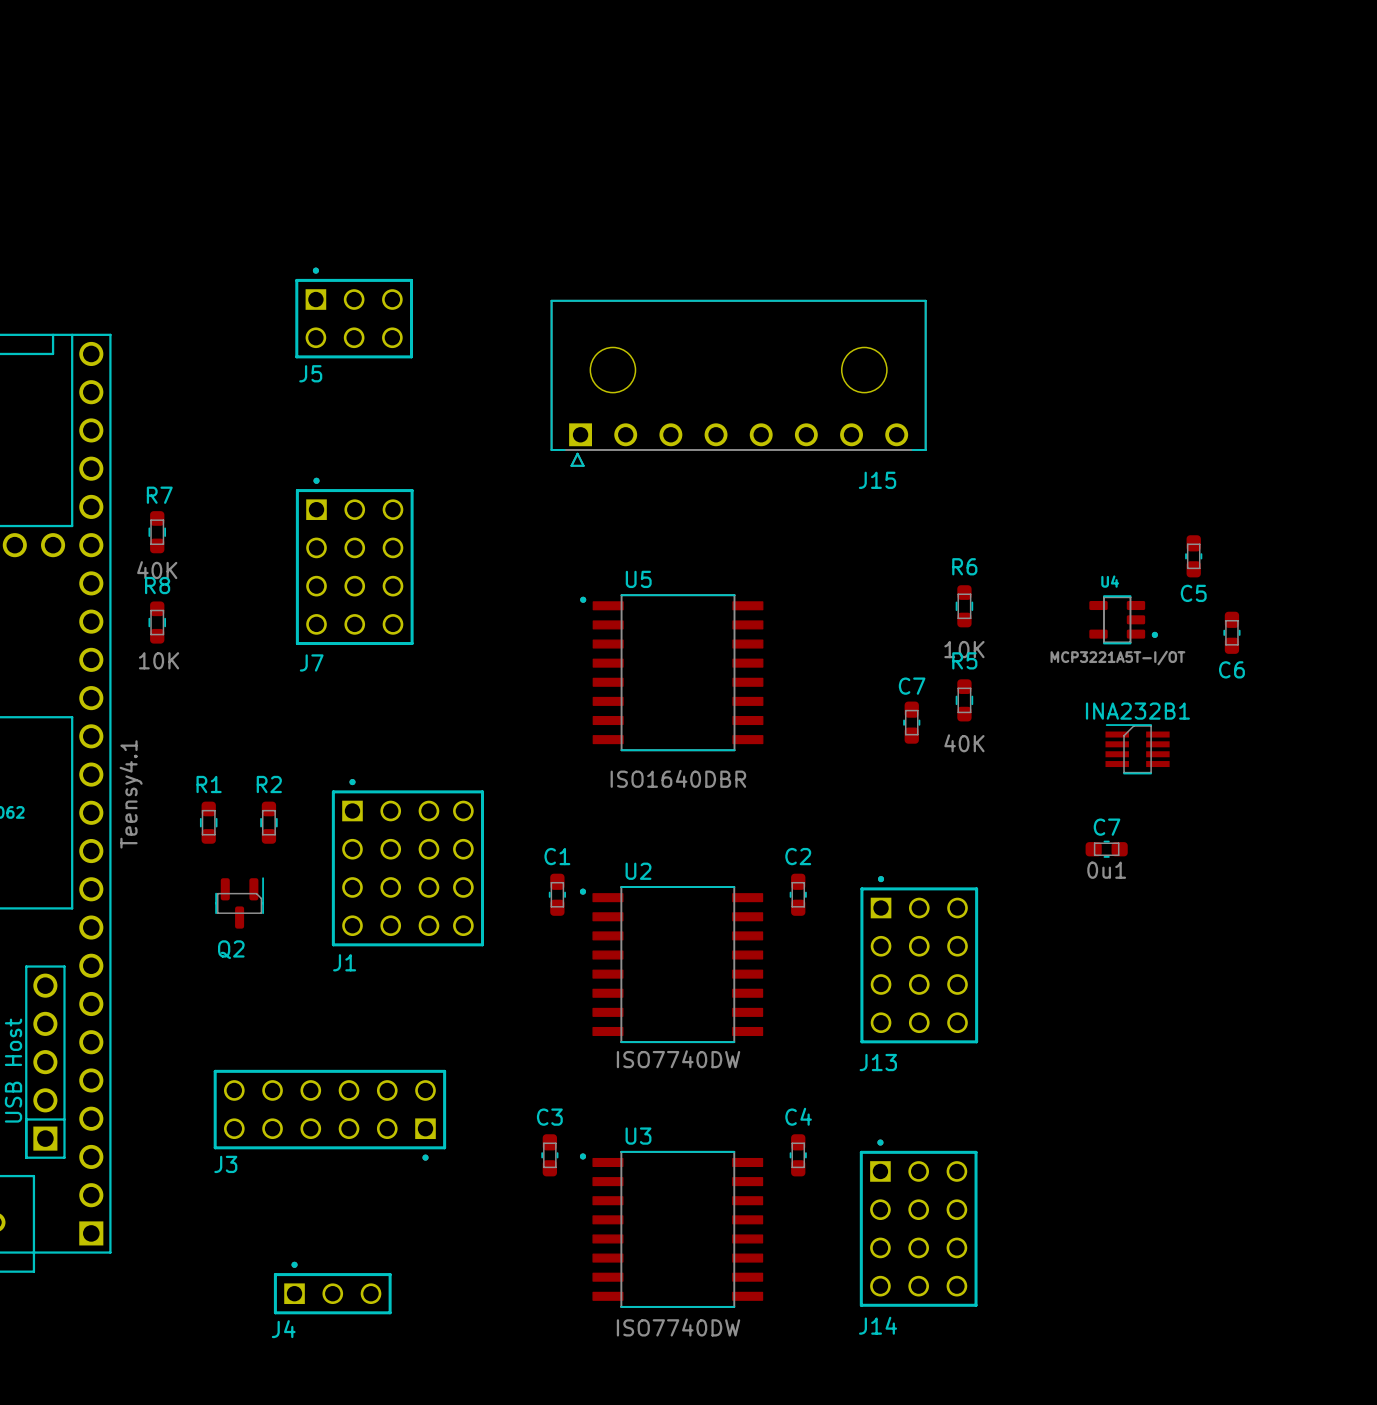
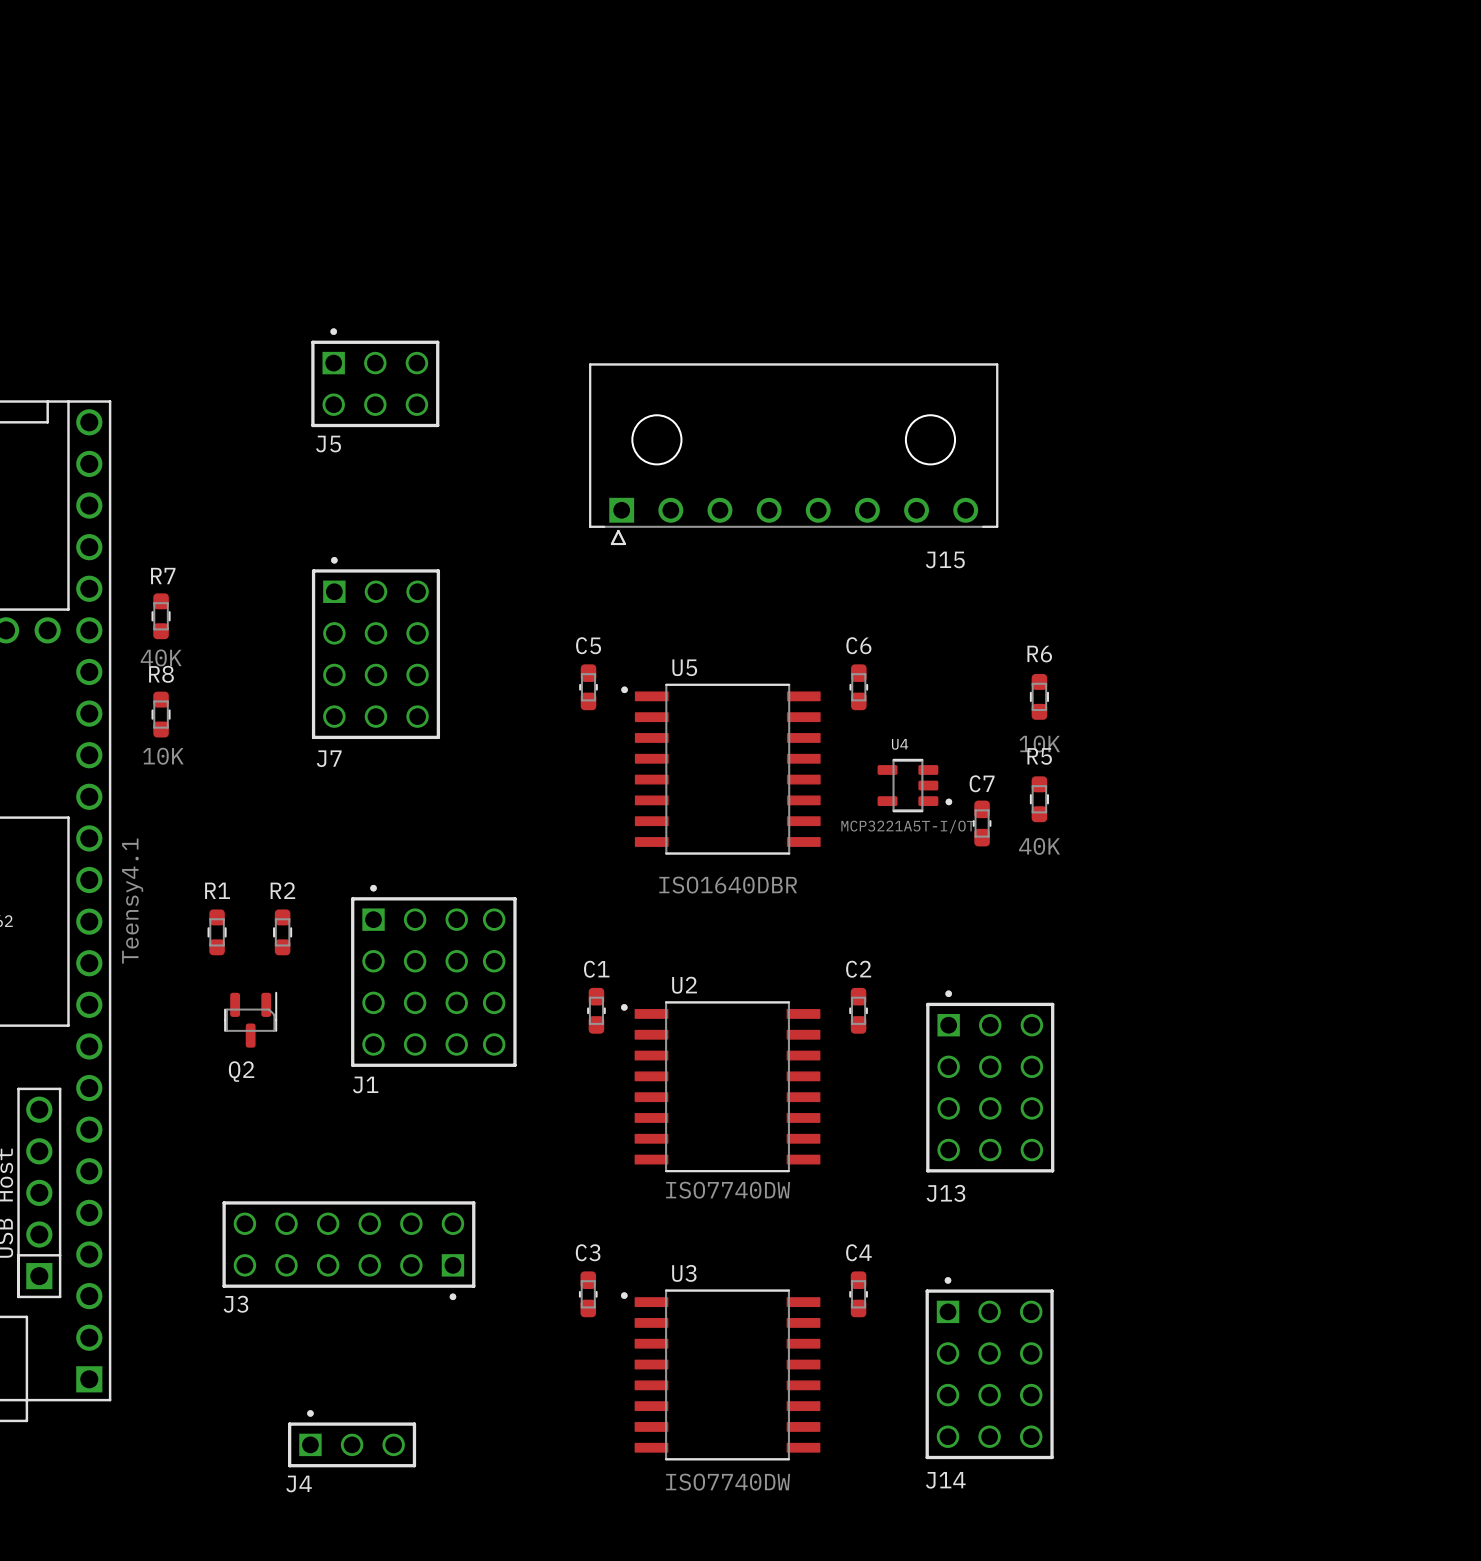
C5 position: (1193, 556) -> (588, 687)
C5 name position: C5 (1193, 593) -> C5 (588, 645)
U4 position: (1123, 619) -> (914, 785)
C6 position: (1231, 632) -> (858, 687)
C6 name position: C6 (1231, 669) -> C6 (858, 645)
INA232B1: (1137, 749) -> none
C7: 0u1 (1106, 849) -> none

